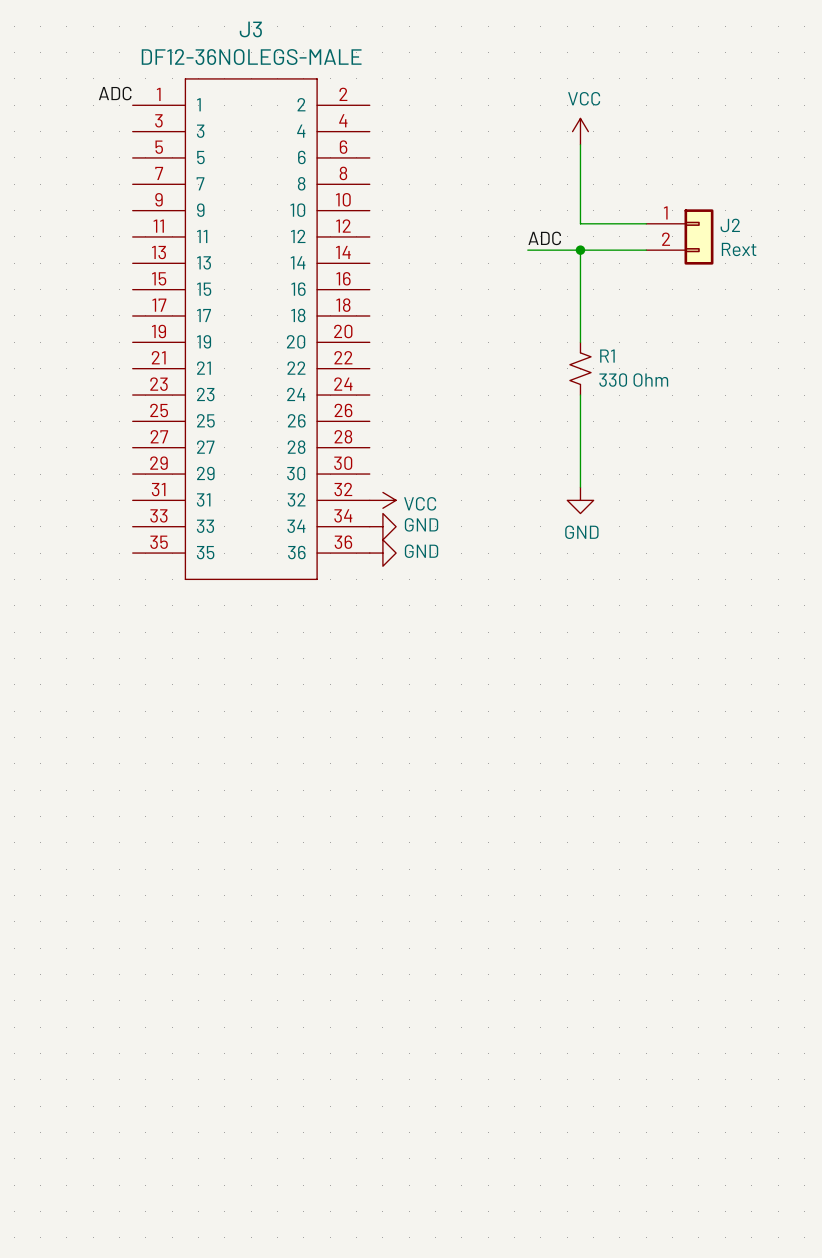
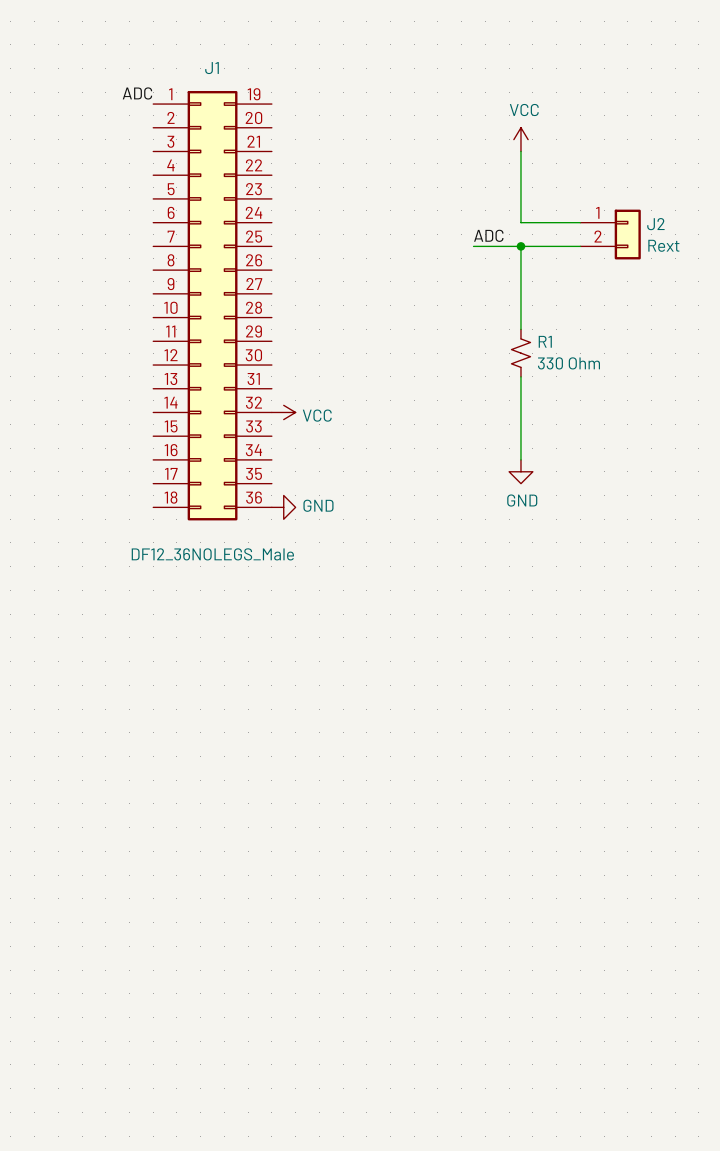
label position: ADC (115, 93) -> ADC (137, 93)
J1: none -> DF12_36NOLEGS_Male (212, 305)
J3: DF12-36NOLEGS-MALE (251, 329) -> none
power symbol position: VCC (382, 500) -> VCC (283, 412)
power symbol: GND (382, 526) -> none
power symbol: none -> GND (283, 507)
power symbol: GND (382, 553) -> none

